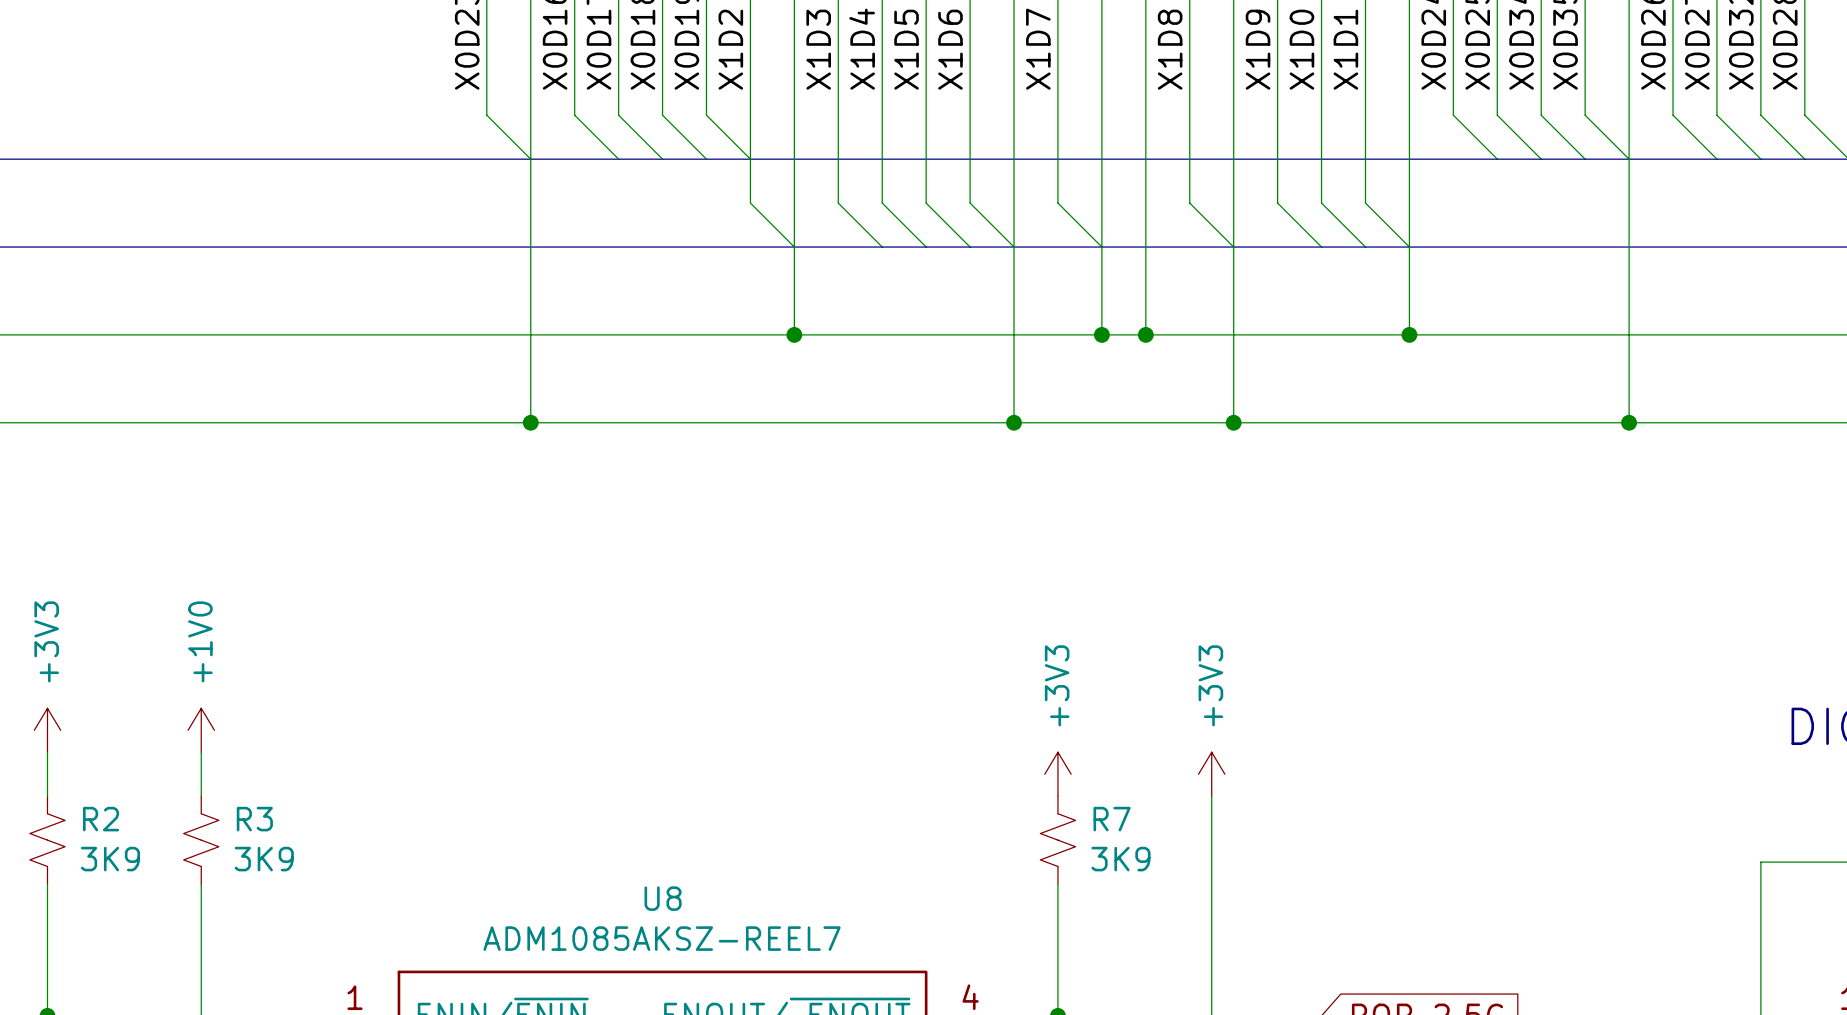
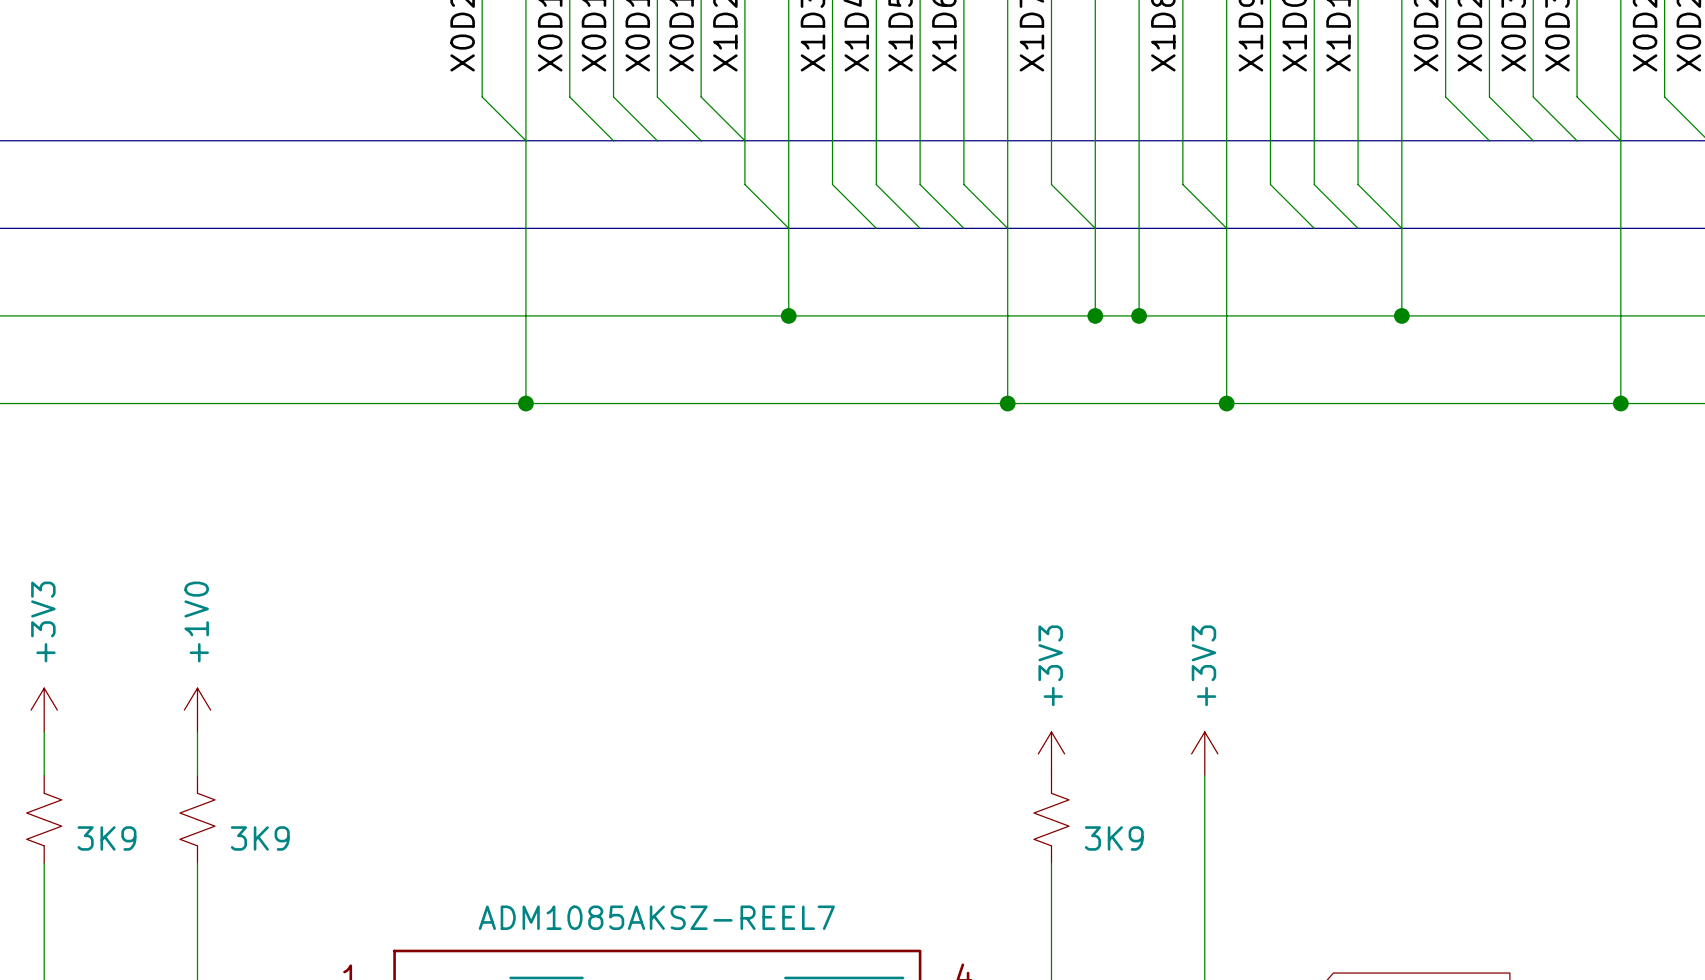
R2 name: R2 (101, 819) -> none
R3 name: R3 (254, 819) -> none
R7 name: R7 (1112, 819) -> none
U8 name: U8 (663, 898) -> none

